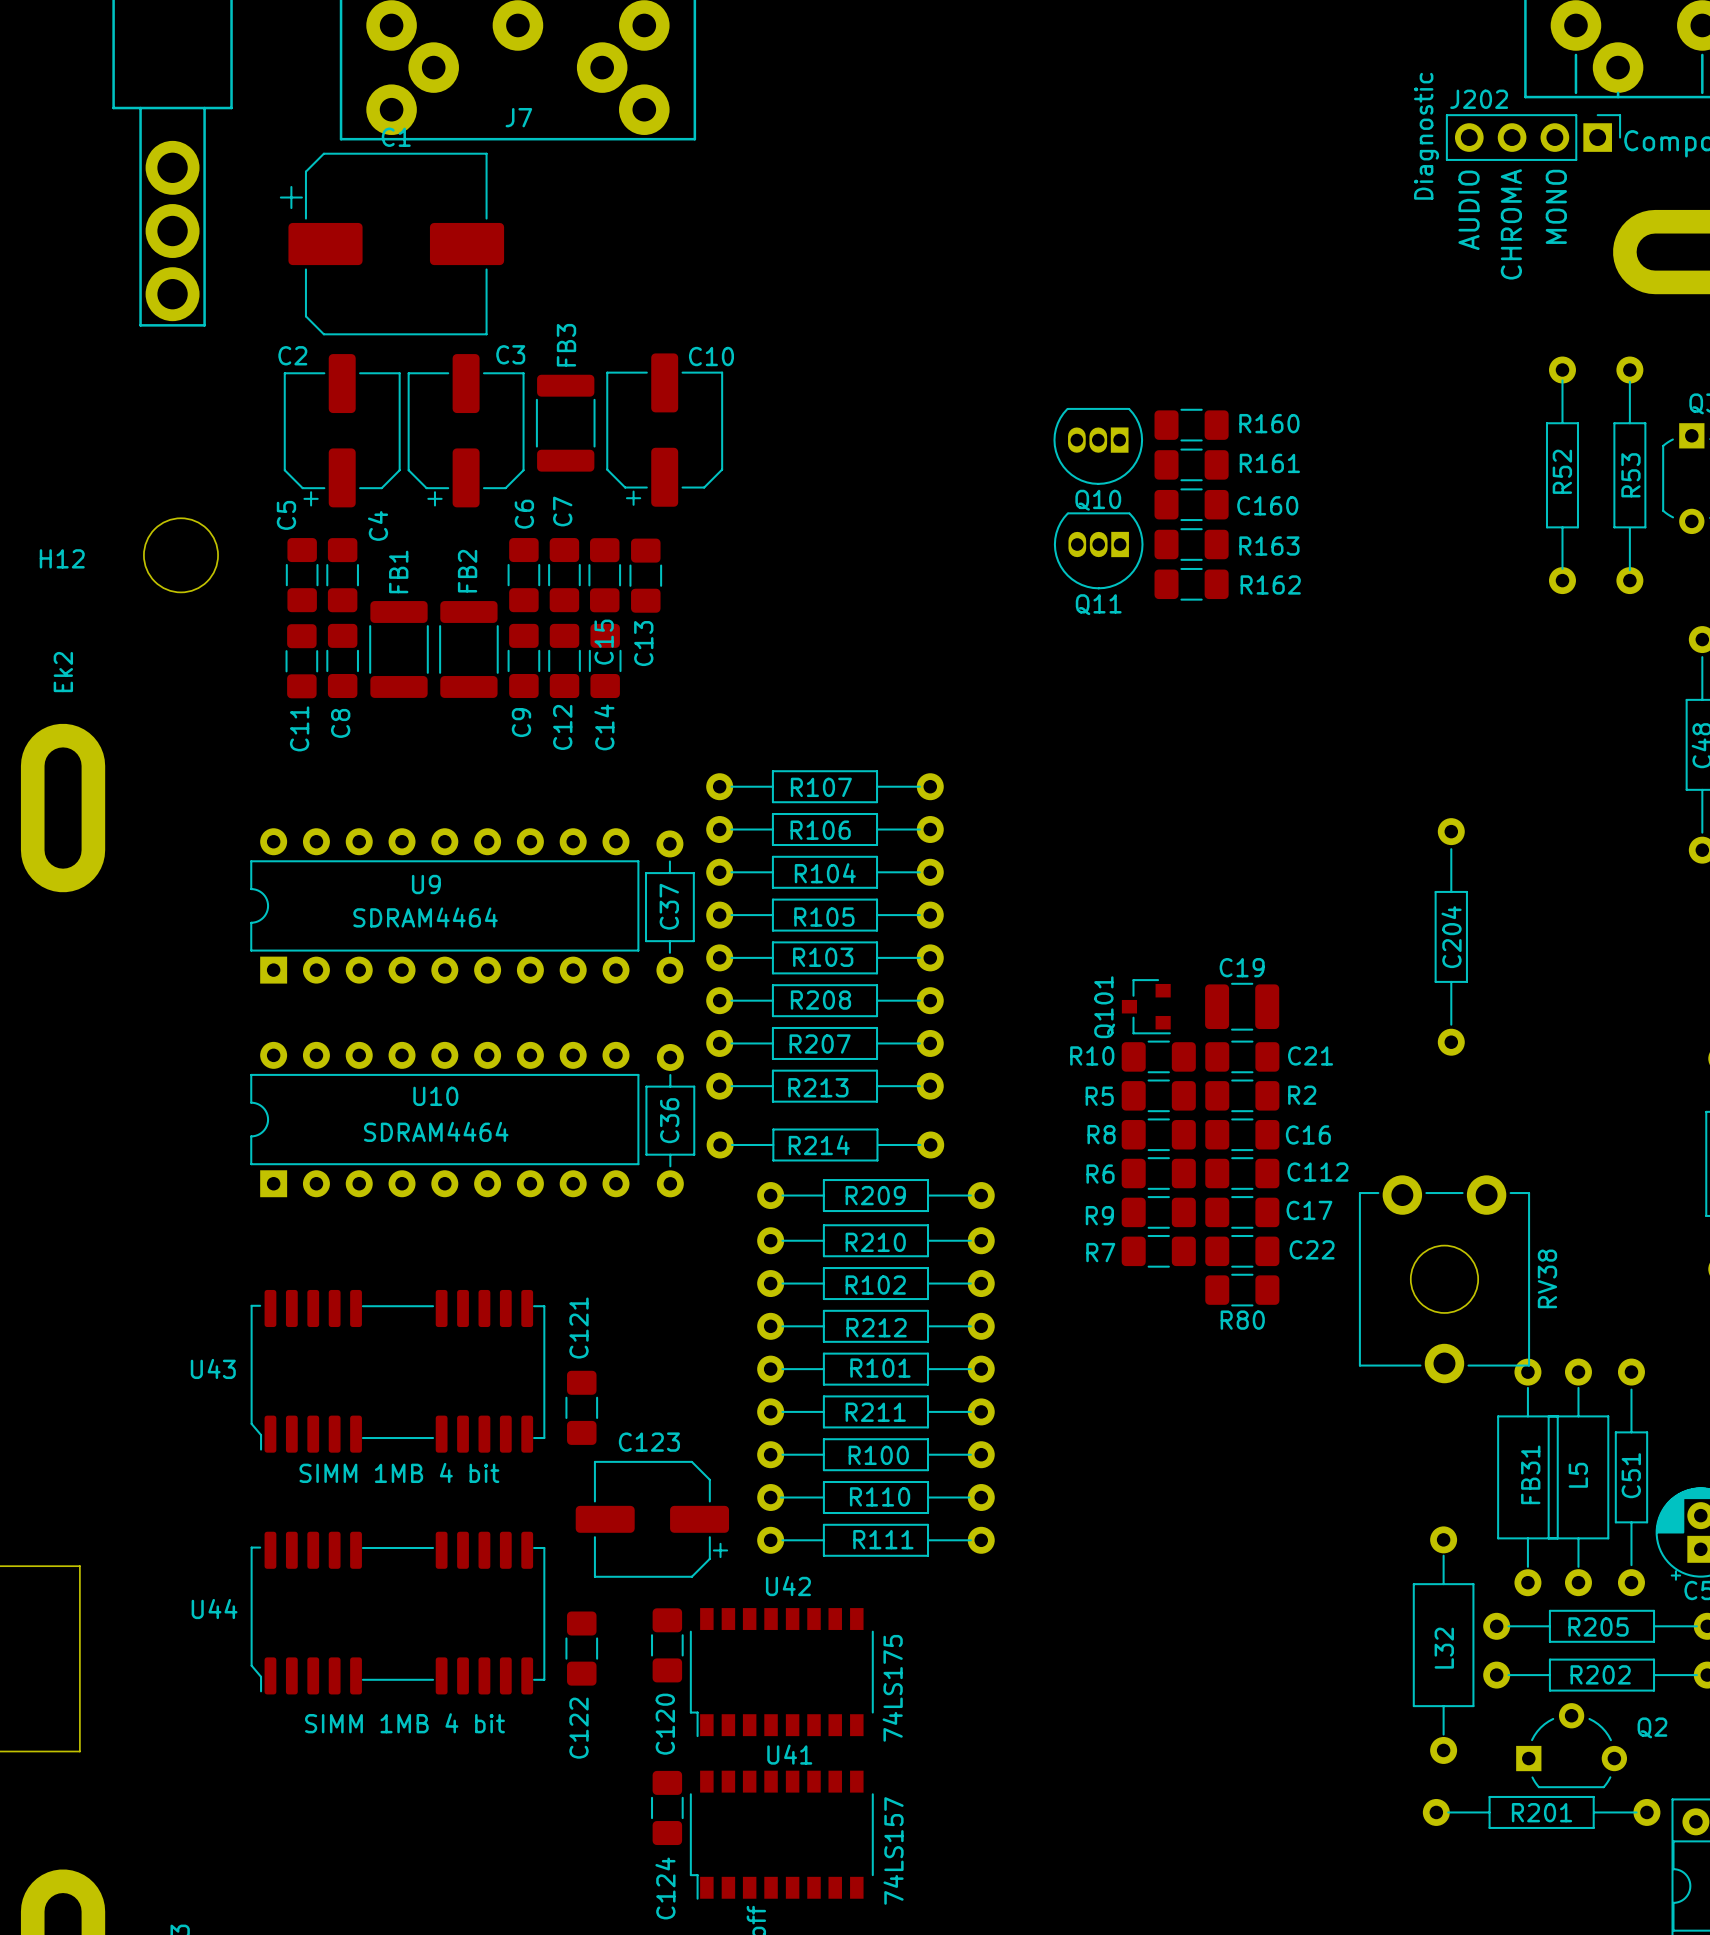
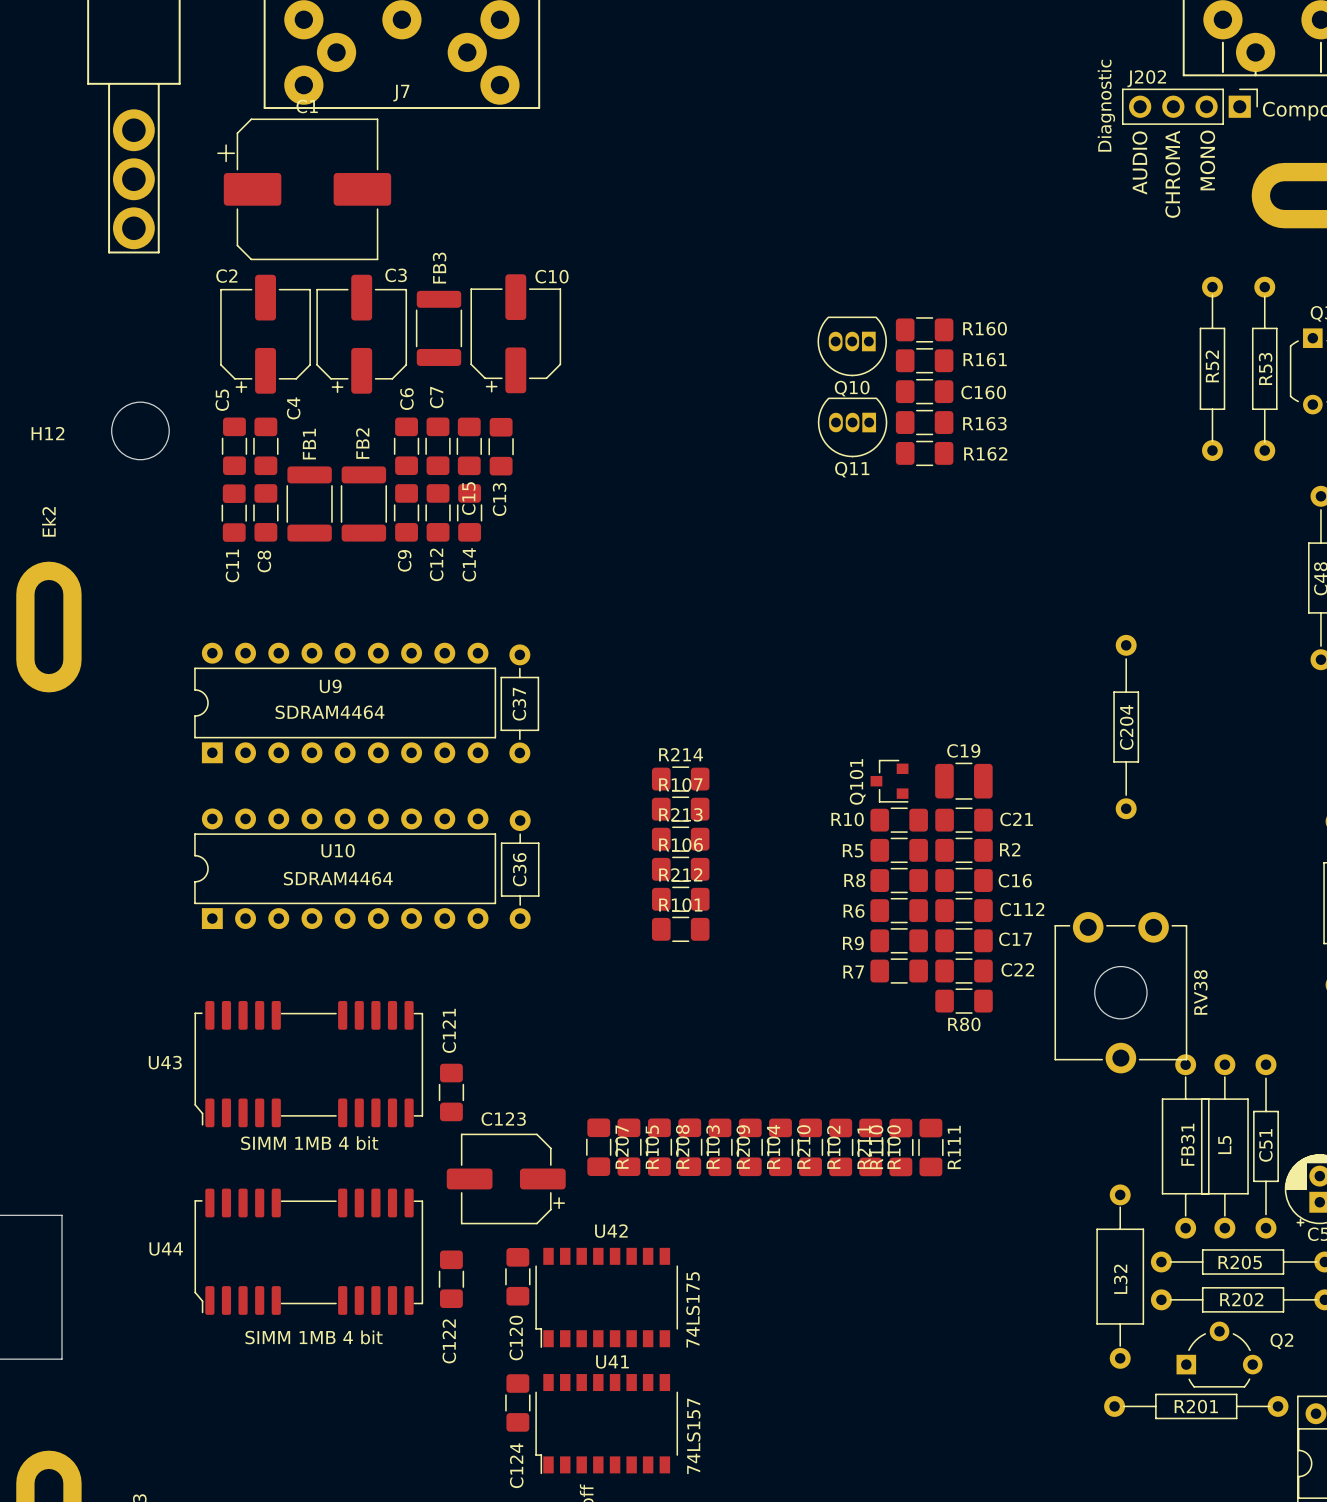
R107 footprint: [706, 770, 944, 804] -> [651, 796, 710, 822]
R106 footprint: [706, 812, 944, 847] -> [651, 856, 710, 882]
R104 footprint: [706, 855, 944, 889] -> [737, 1118, 763, 1177]
R105 footprint: [706, 898, 944, 932] -> [616, 1118, 642, 1177]
R103 footprint: [706, 941, 944, 975] -> [677, 1118, 703, 1176]
R208 footprint: [706, 984, 944, 1018] -> [646, 1118, 673, 1176]
R208 name position: R208 (820, 1000) -> R208 (682, 1146)
R207 footprint: [706, 1026, 944, 1060] -> [586, 1118, 612, 1176]
R207 name position: R207 (820, 1044) -> R207 (622, 1147)
R213 footprint: [706, 1069, 944, 1103] -> [651, 826, 710, 852]
R214 footprint: [706, 1128, 945, 1162] -> [651, 766, 710, 792]
R209 footprint: [757, 1179, 995, 1213] -> [707, 1118, 733, 1177]
R210 footprint: [757, 1224, 995, 1258] -> [767, 1118, 794, 1177]
R102 footprint: [757, 1267, 995, 1301] -> [797, 1118, 824, 1177]
R212 footprint: [757, 1309, 995, 1343] -> [652, 886, 710, 912]
R101 footprint: [757, 1352, 995, 1386] -> [651, 916, 710, 943]
R211 footprint: [757, 1395, 995, 1429] -> [828, 1118, 854, 1177]
R100 footprint: [757, 1438, 995, 1472] -> [857, 1118, 884, 1177]
R110 footprint: [757, 1480, 995, 1515] -> [888, 1118, 914, 1177]
R110 name position: R110 (880, 1496) -> R110 (876, 1147)
R111 footprint: [757, 1523, 995, 1557] -> [918, 1118, 944, 1177]

